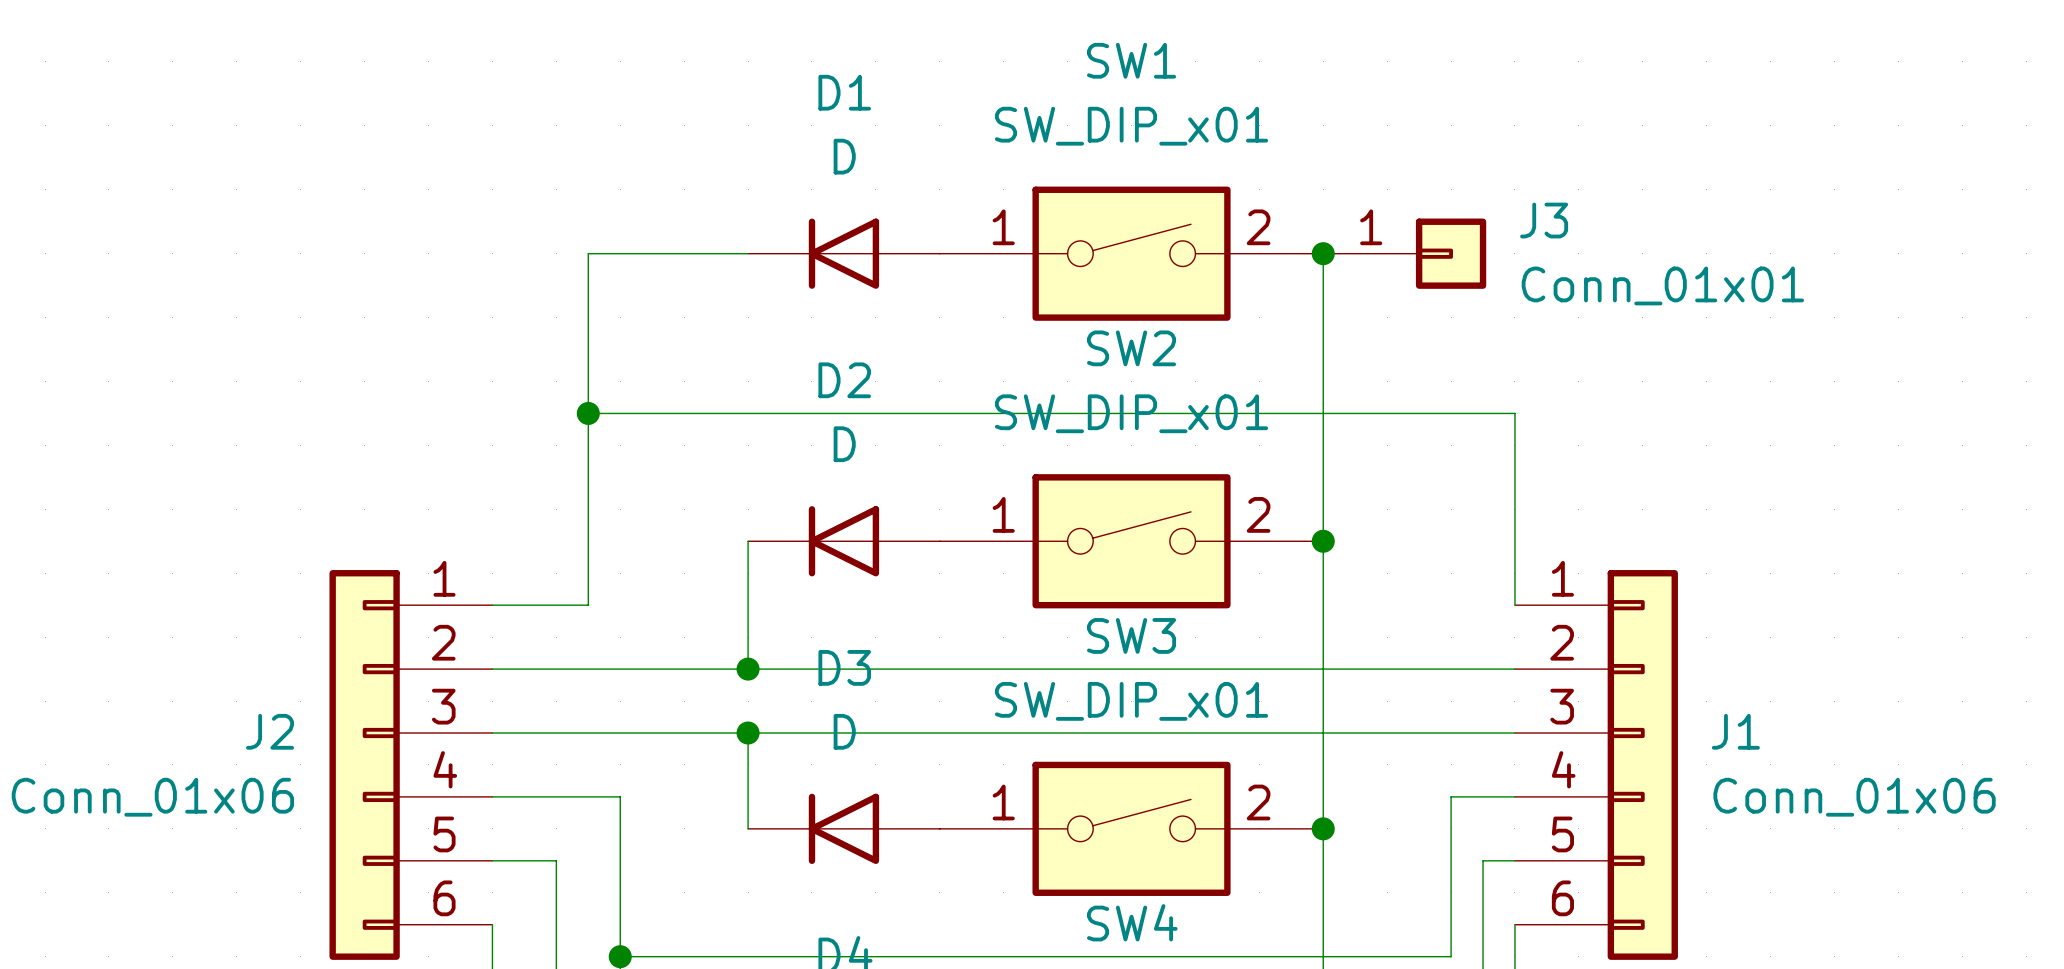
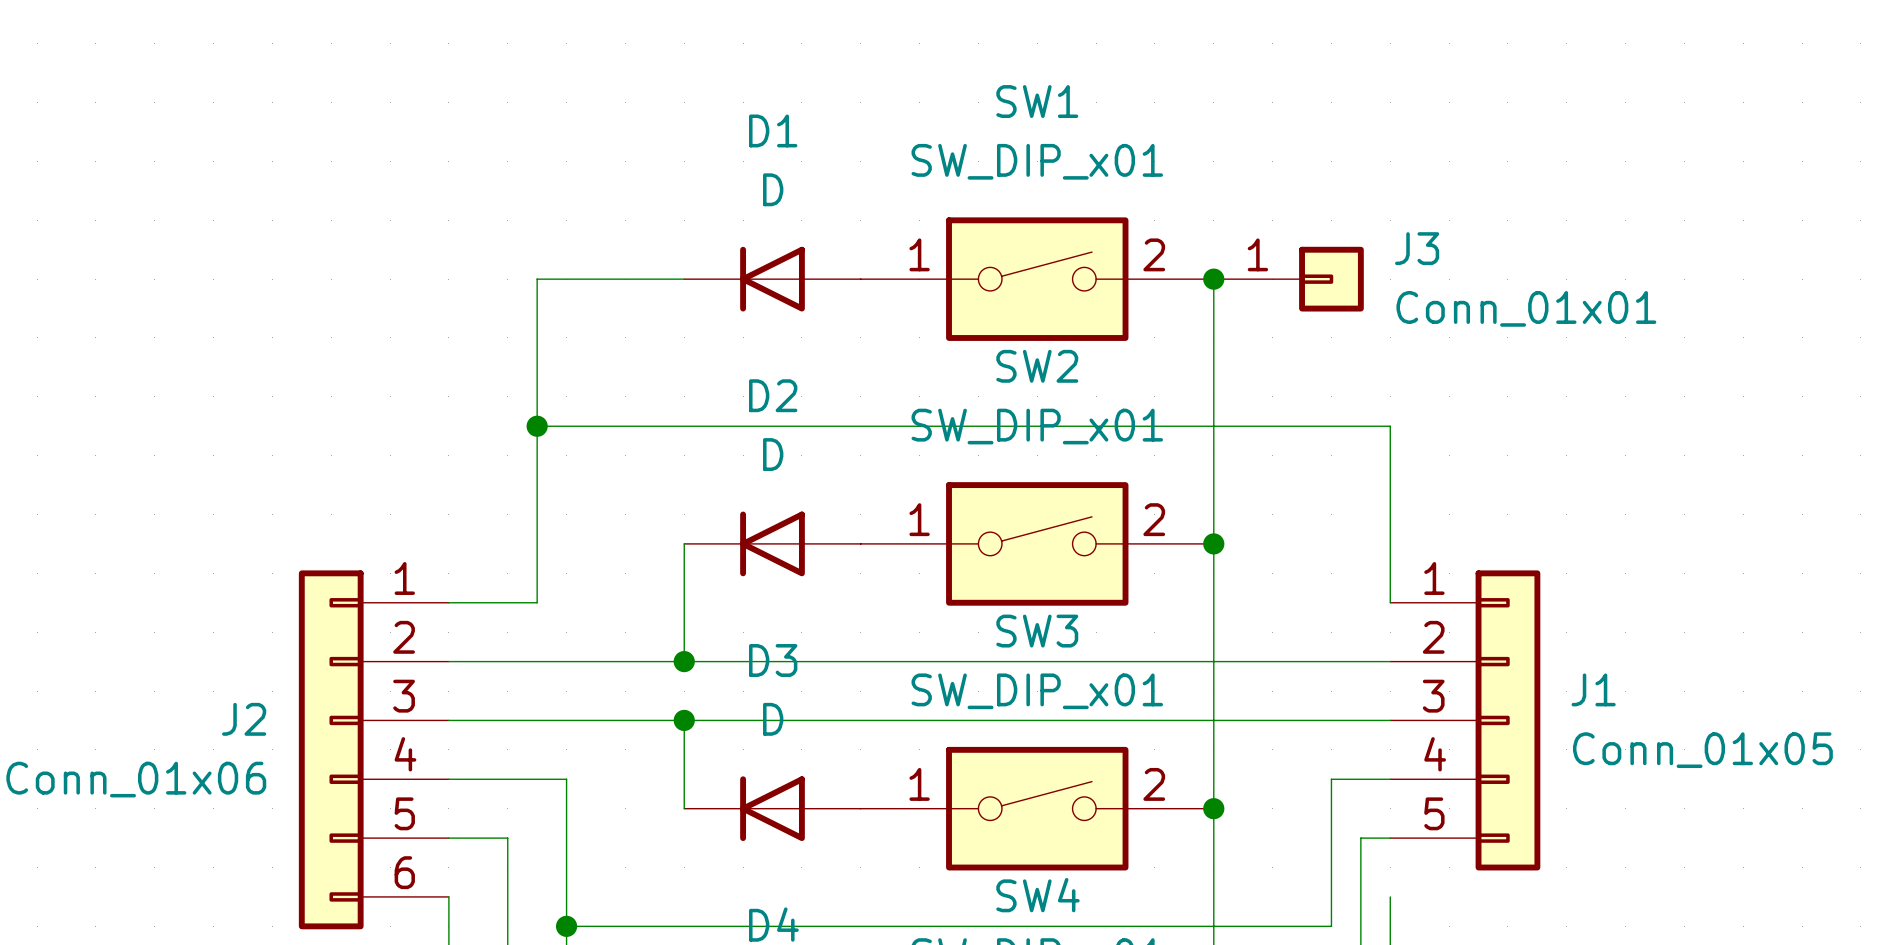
J1 symbol: [1514, 570, 1678, 960] -> [1390, 570, 1541, 871]
J1 value: Conn_01x06 (1854, 797) -> Conn_01x05 (1702, 750)

